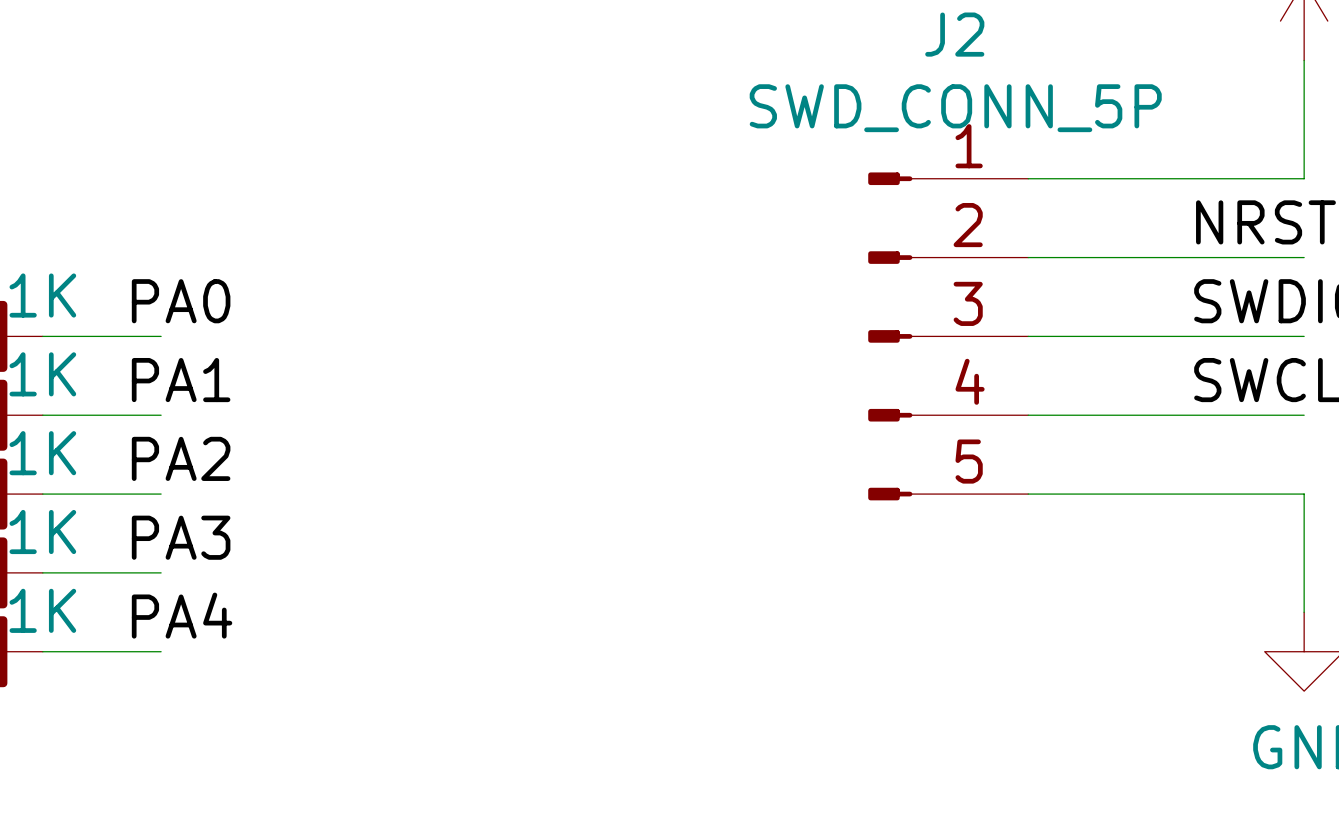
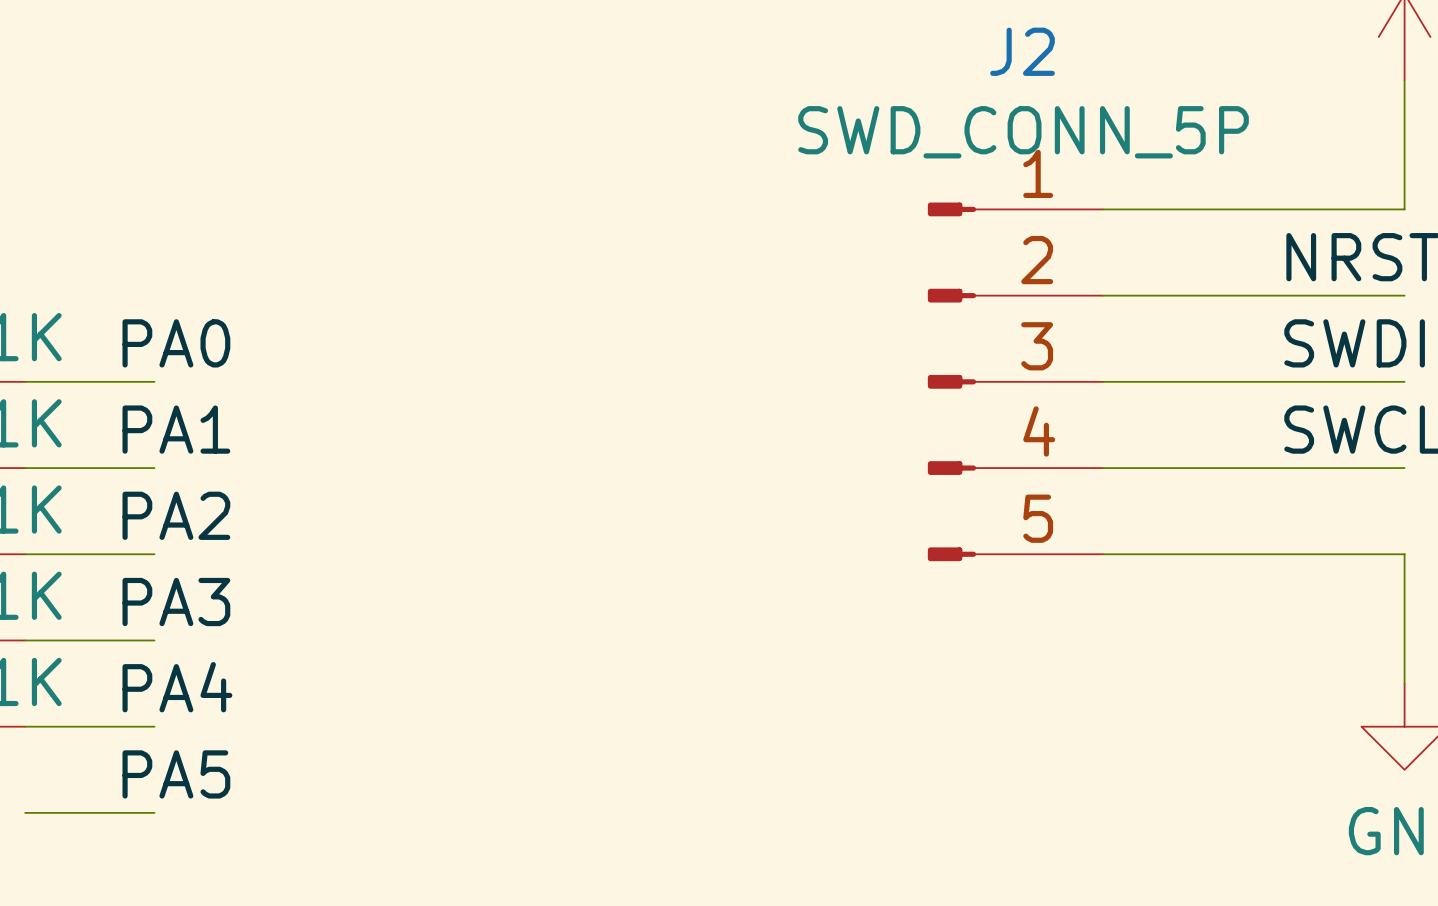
label: none -> PA5 (176, 774)
wire: none -> (25, 812) (154, 812)

